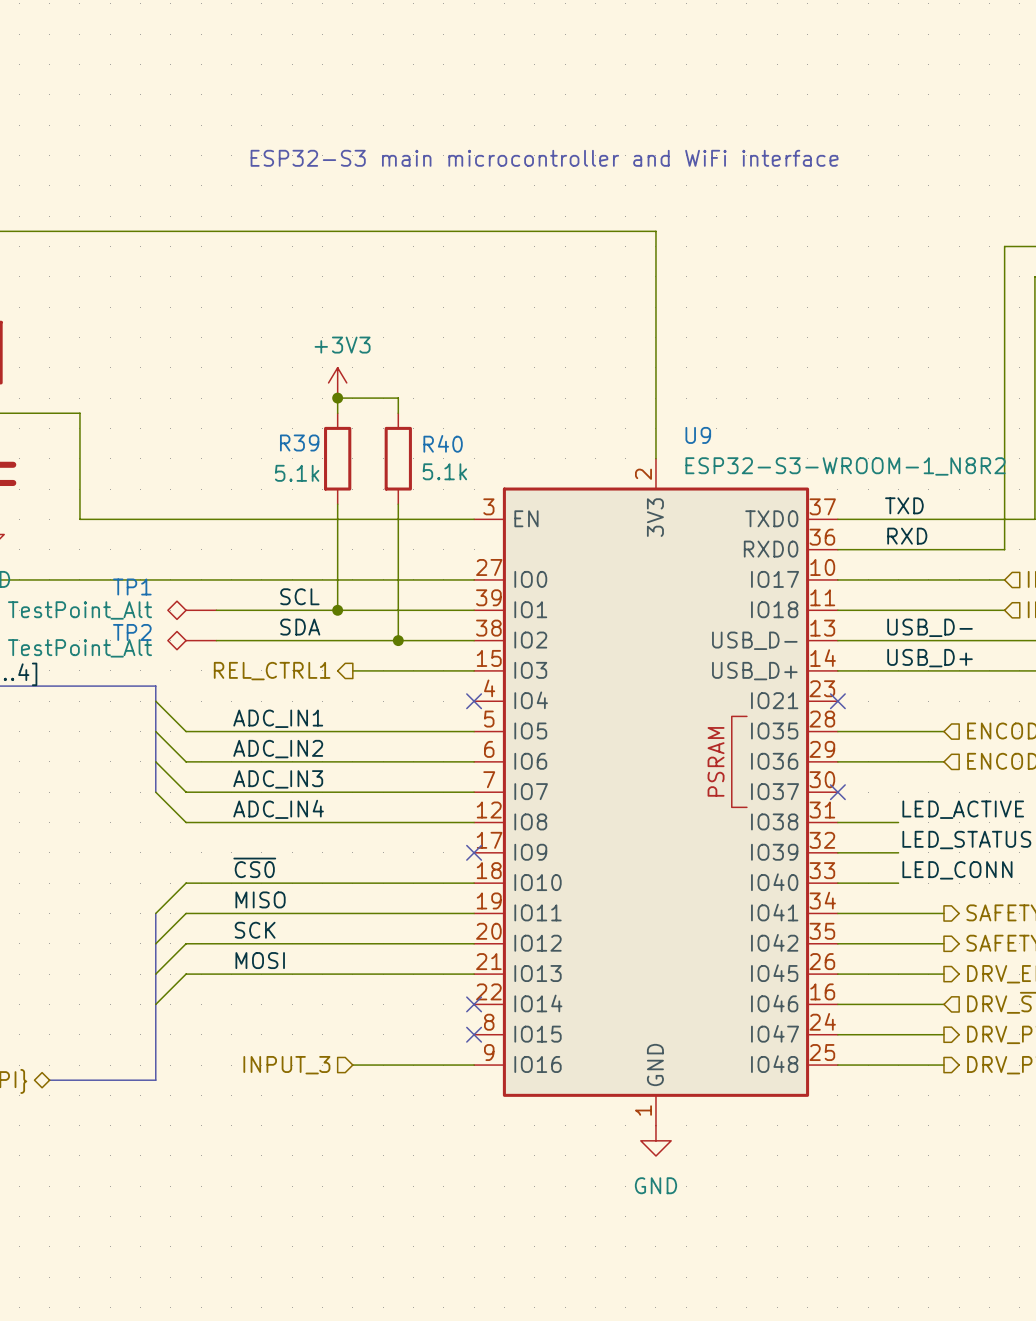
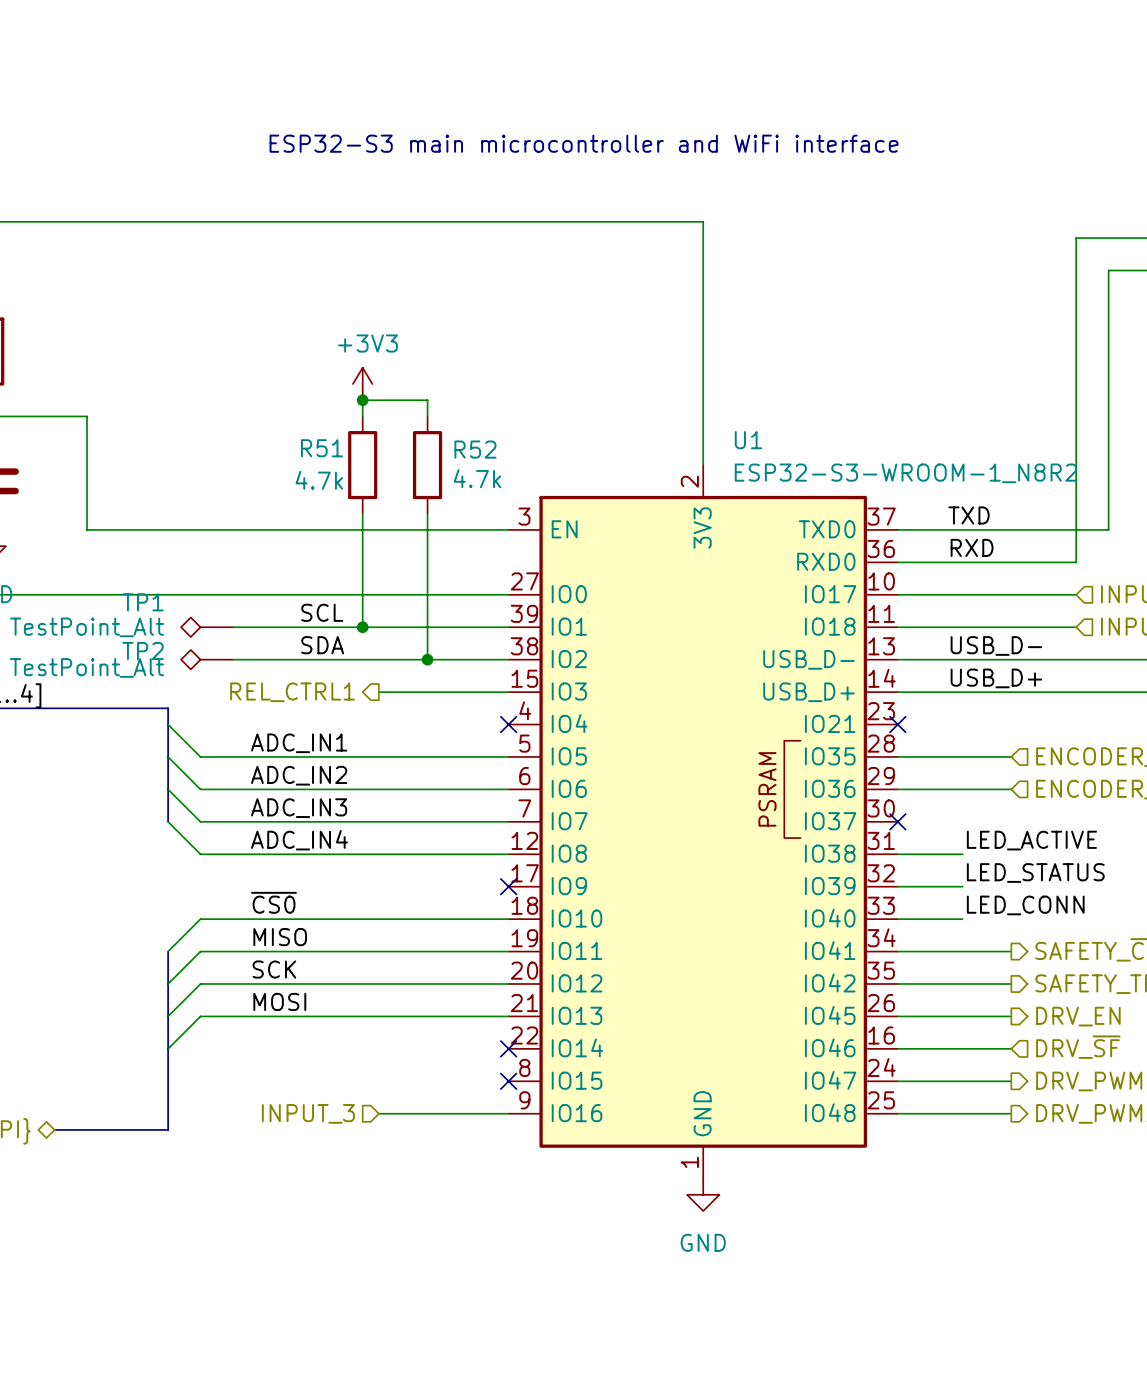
U9 name: U9 (698, 435) -> U1 (748, 440)
R39 name: R39 (299, 442) -> R51 (322, 448)
R40 name: R40 (443, 443) -> R52 (475, 449)
R40 value: 5.1k (444, 471) -> 4.7k (477, 478)
R39 value: 5.1k (297, 473) -> 4.7k (319, 480)

